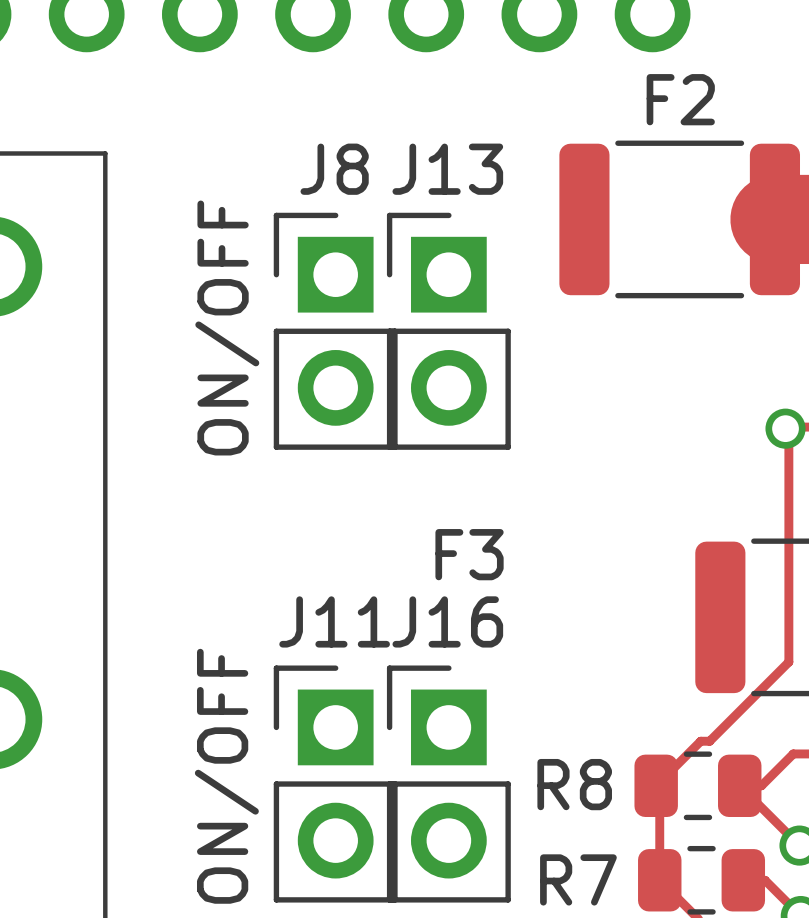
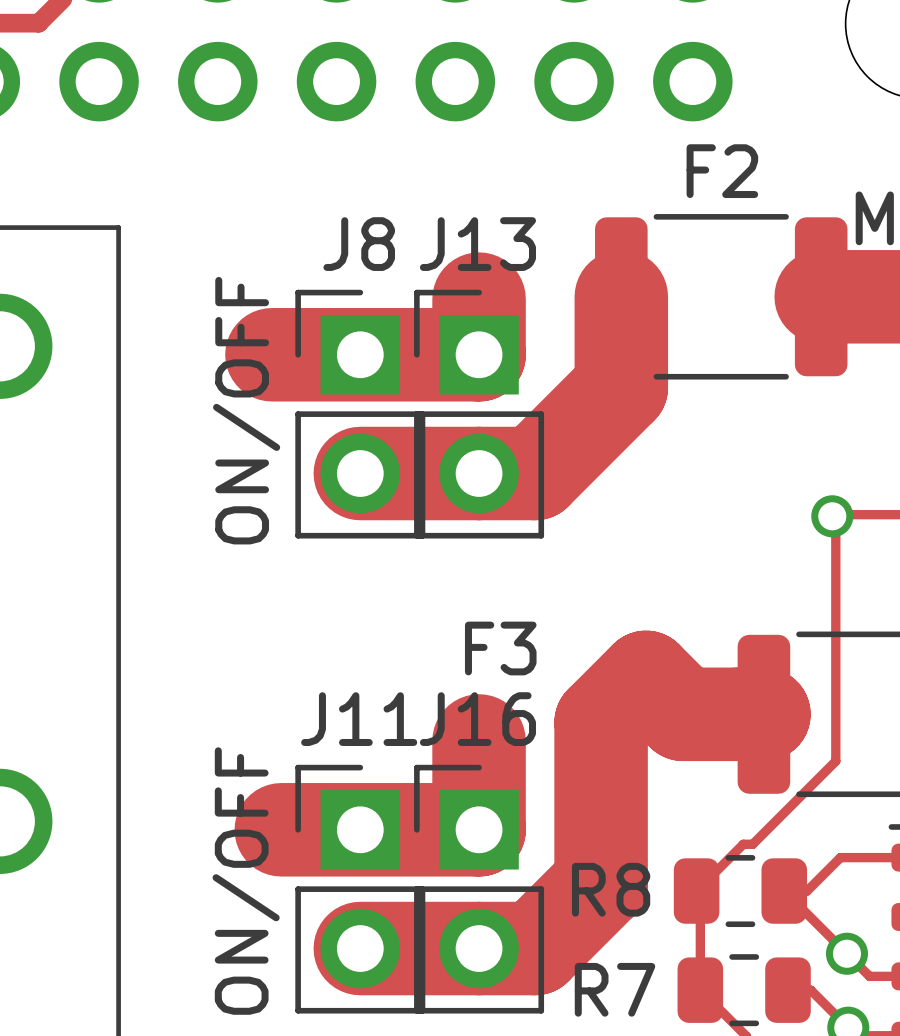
track: none -> (621, 296) (621, 387) (535, 473) (360, 473)
track: none -> (479, 299) (479, 354) (271, 354)
track: none -> (763, 714) (683, 714) (646, 677) (601, 722) (601, 882) (535, 948) (360, 948)
track: none -> (479, 740) (479, 829) (281, 829)

